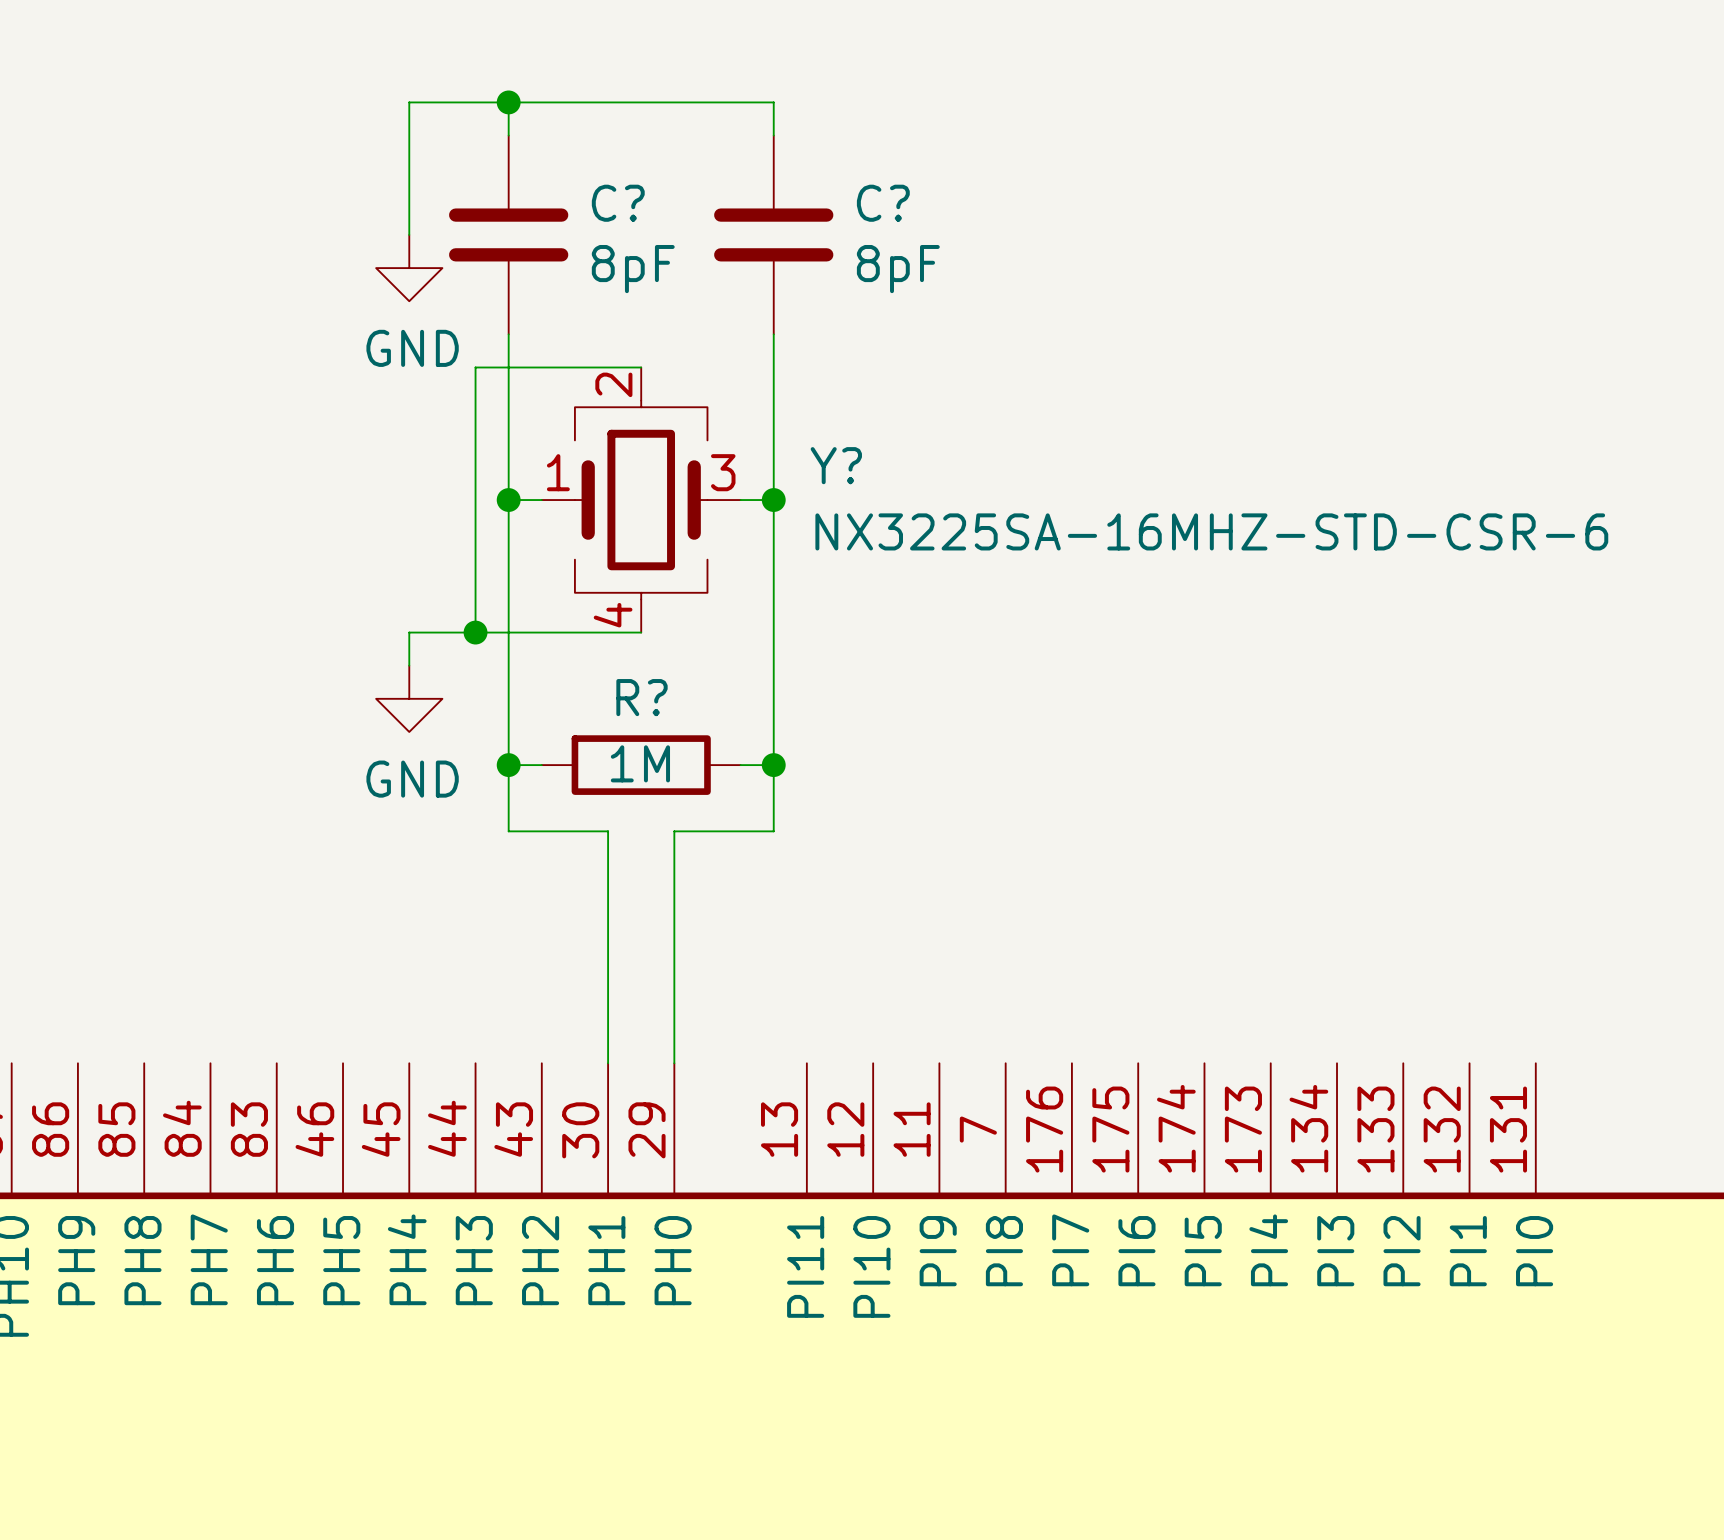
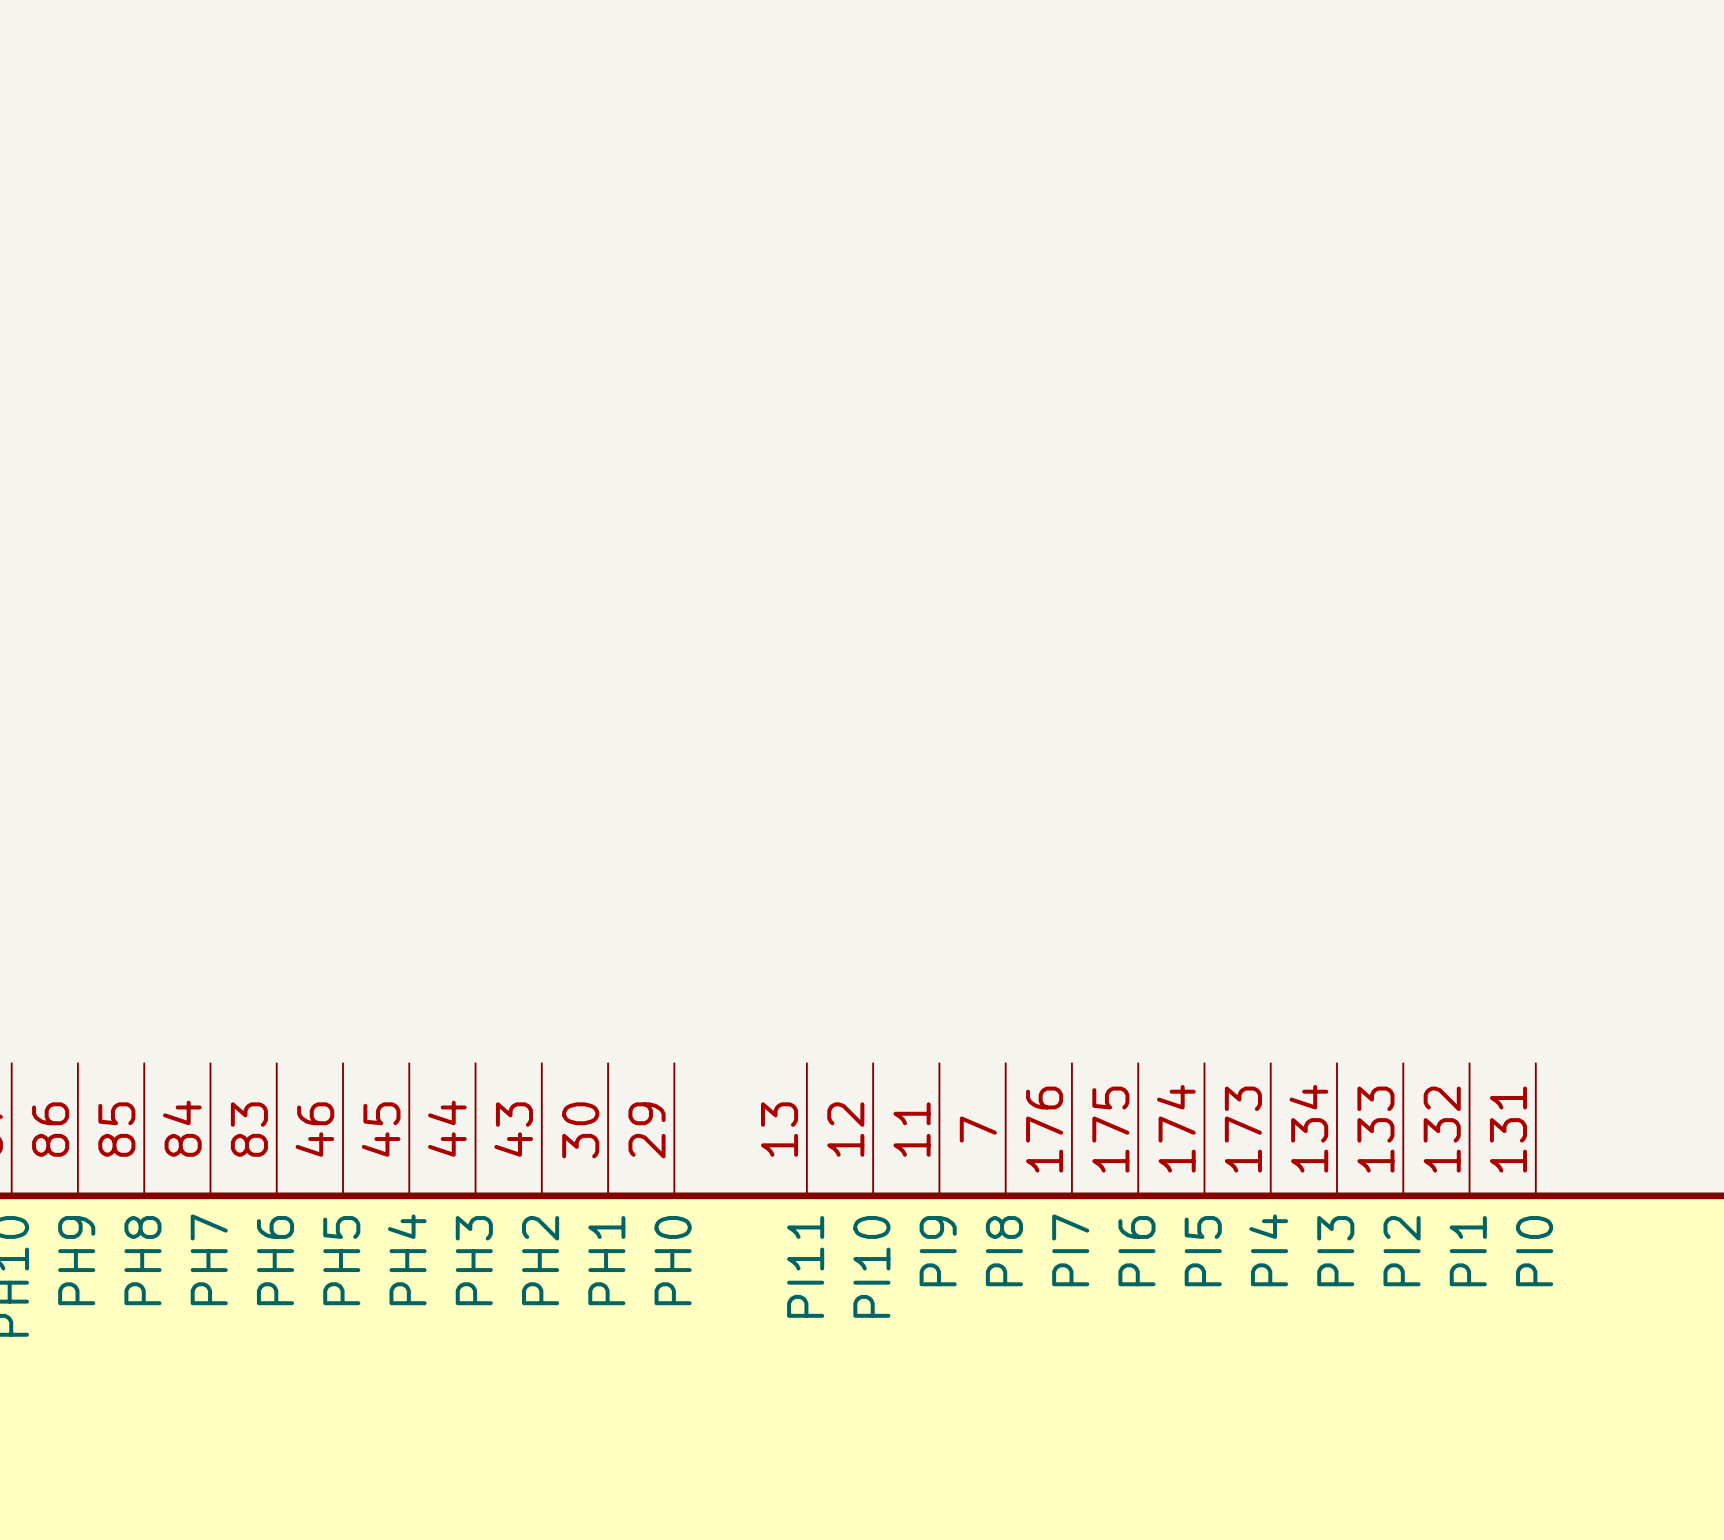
wire: (508, 102) (508, 135) -> none
junction: (508, 102) -> none
wire: (773, 135) (773, 102) (409, 102) (409, 234) -> none
C?: 8pF (508, 234) -> none
C?: 8pF (773, 234) -> none
power symbol: GND (409, 268) -> none
wire: (508, 334) (508, 831) (608, 831) (608, 1063) -> none
wire: (773, 334) (773, 831) (674, 831) (674, 1063) -> none
wire: (641, 367) (475, 367) (475, 632) -> none
wire: (508, 500) (541, 500) -> none
junction: (508, 500) -> none
Y?: NX3225SA-16MHZ-STD-CSR-6 (641, 500) -> none
wire: (740, 500) (773, 500) -> none
junction: (773, 500) -> none
junction: (475, 632) -> none
wire: (641, 632) (409, 632) (409, 665) -> none
power symbol: GND (409, 698) -> none
wire: (508, 765) (541, 765) -> none
junction: (508, 765) -> none
R?: 1M (641, 765) -> none
wire: (740, 765) (773, 765) -> none
junction: (773, 765) -> none

